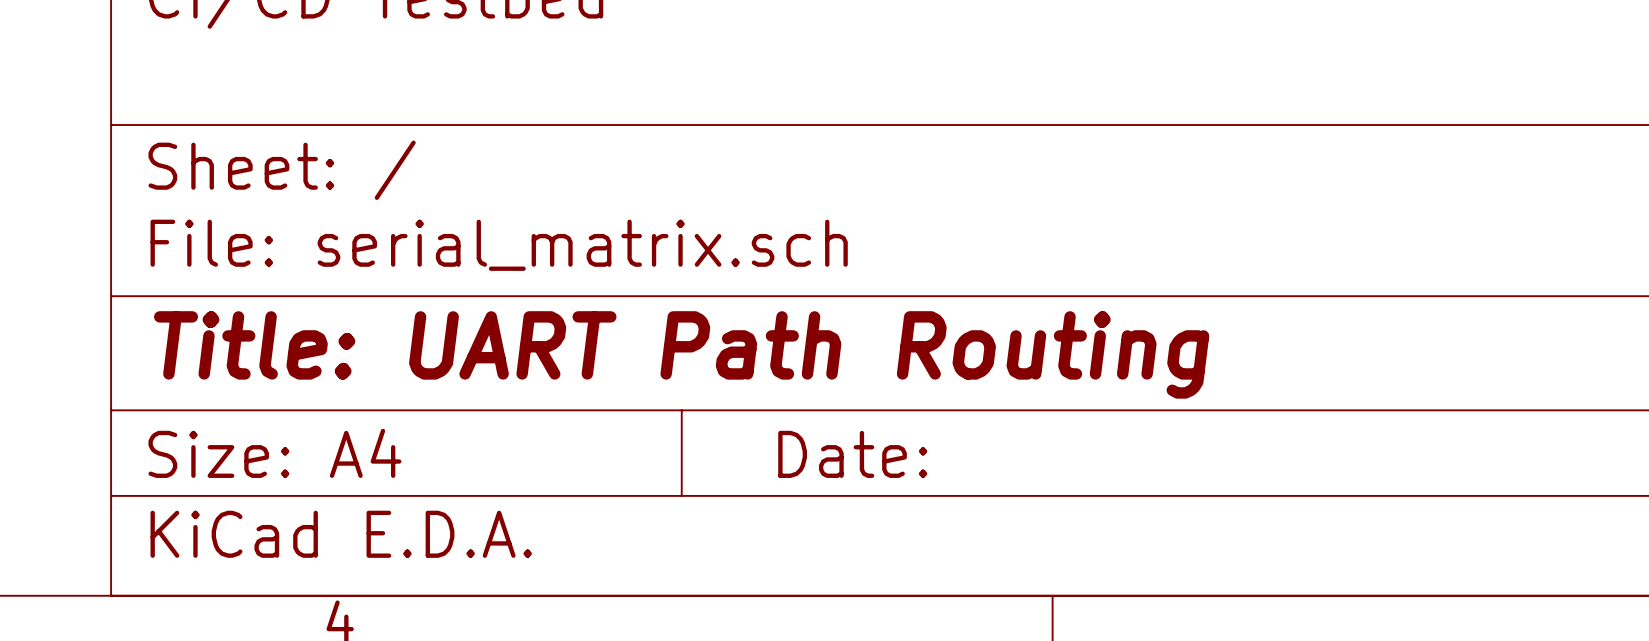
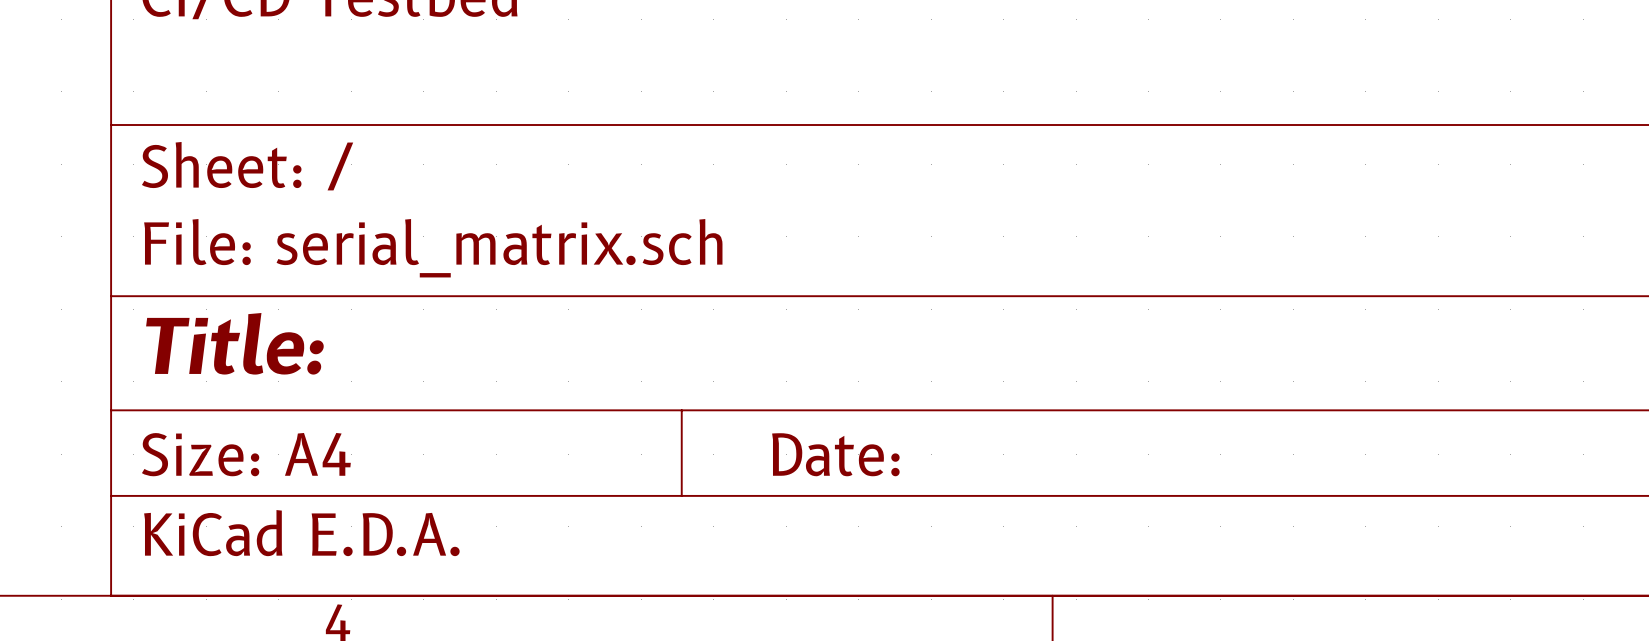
title block: Title: UART Path Routing (681, 354) -> Title: (234, 343)

